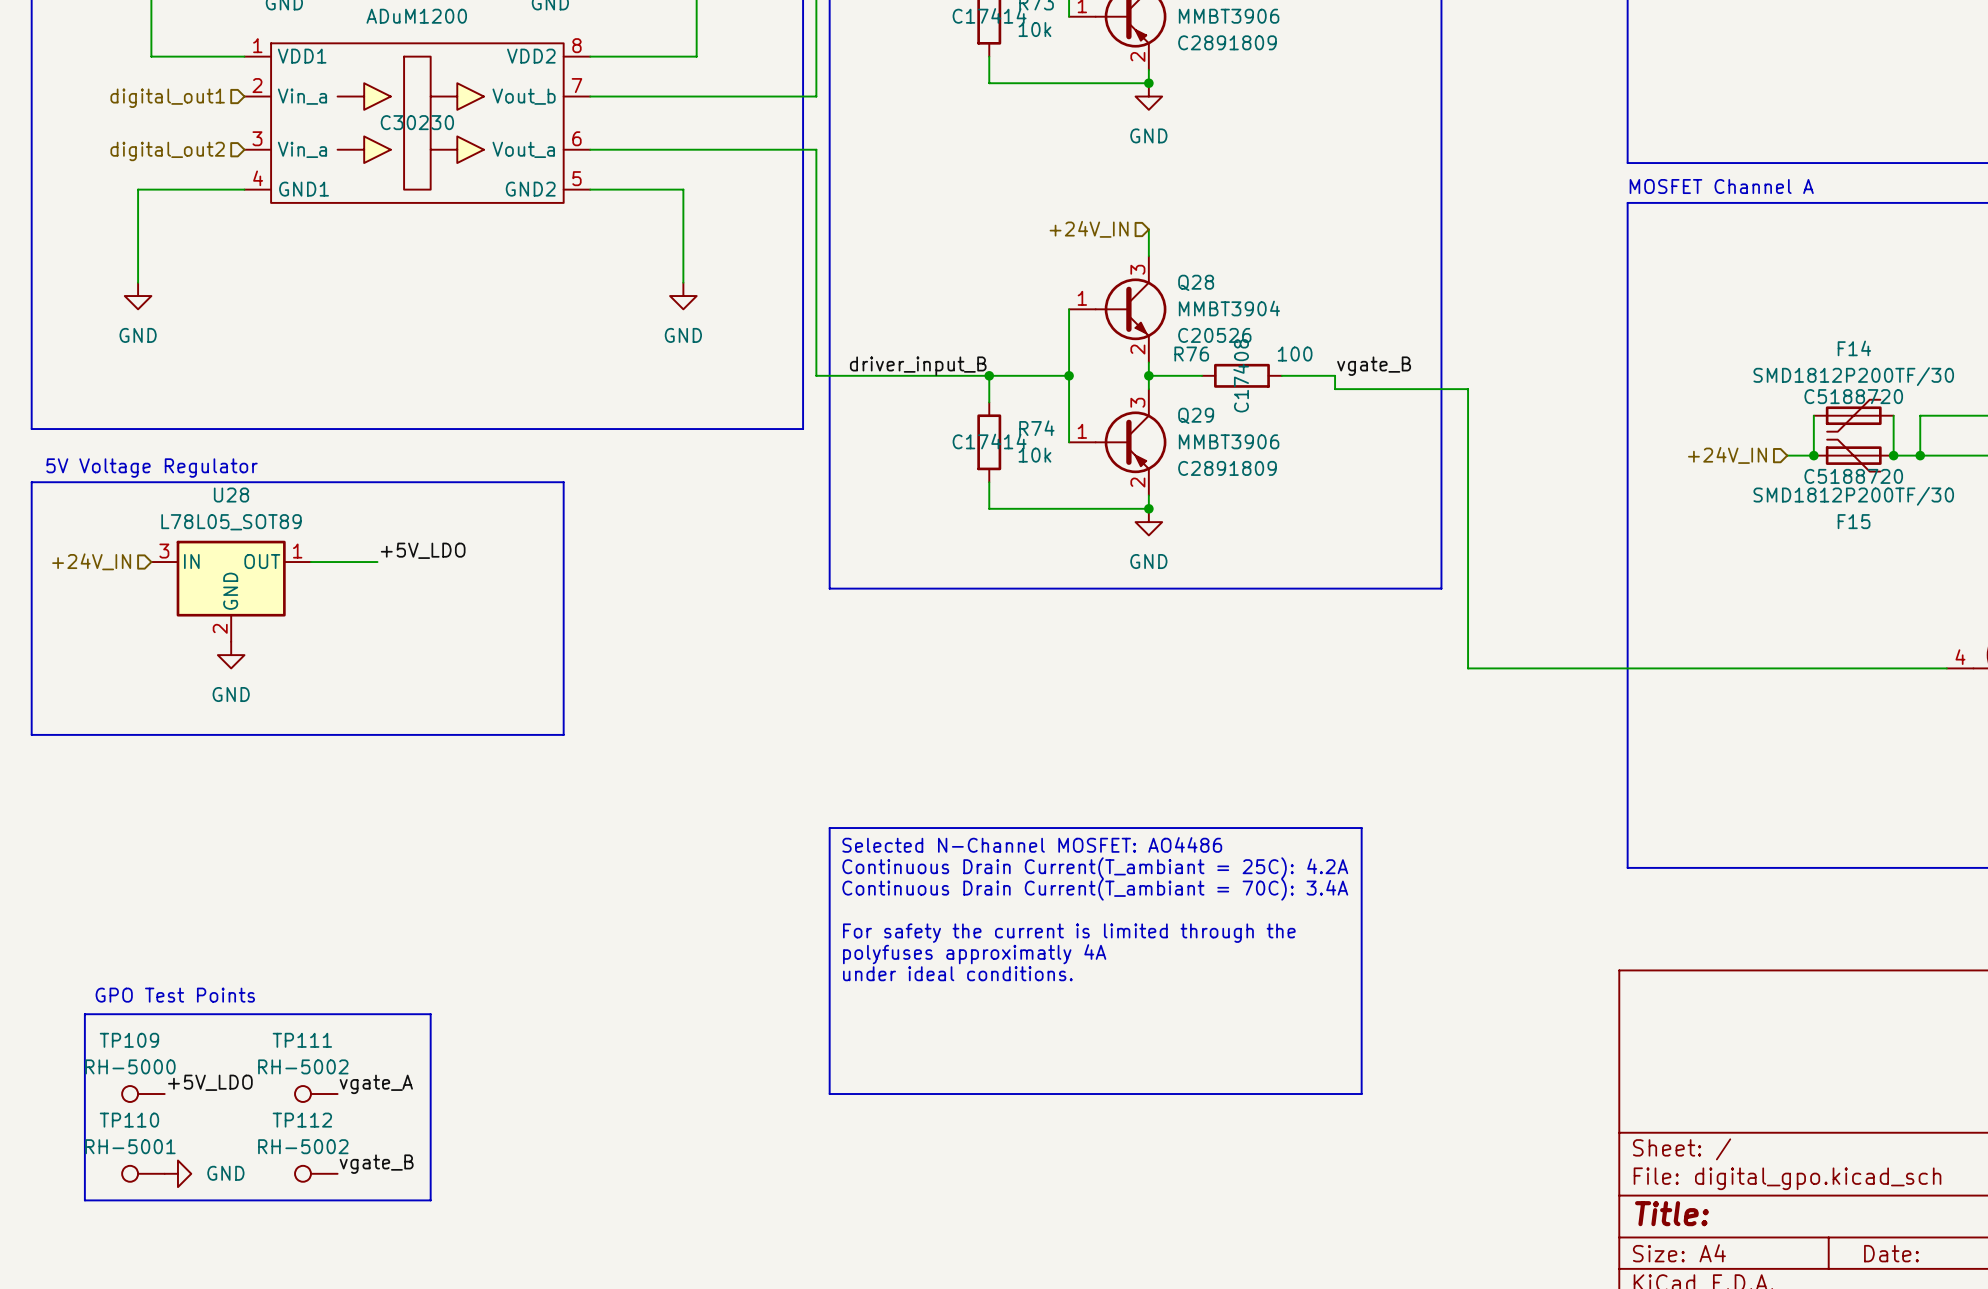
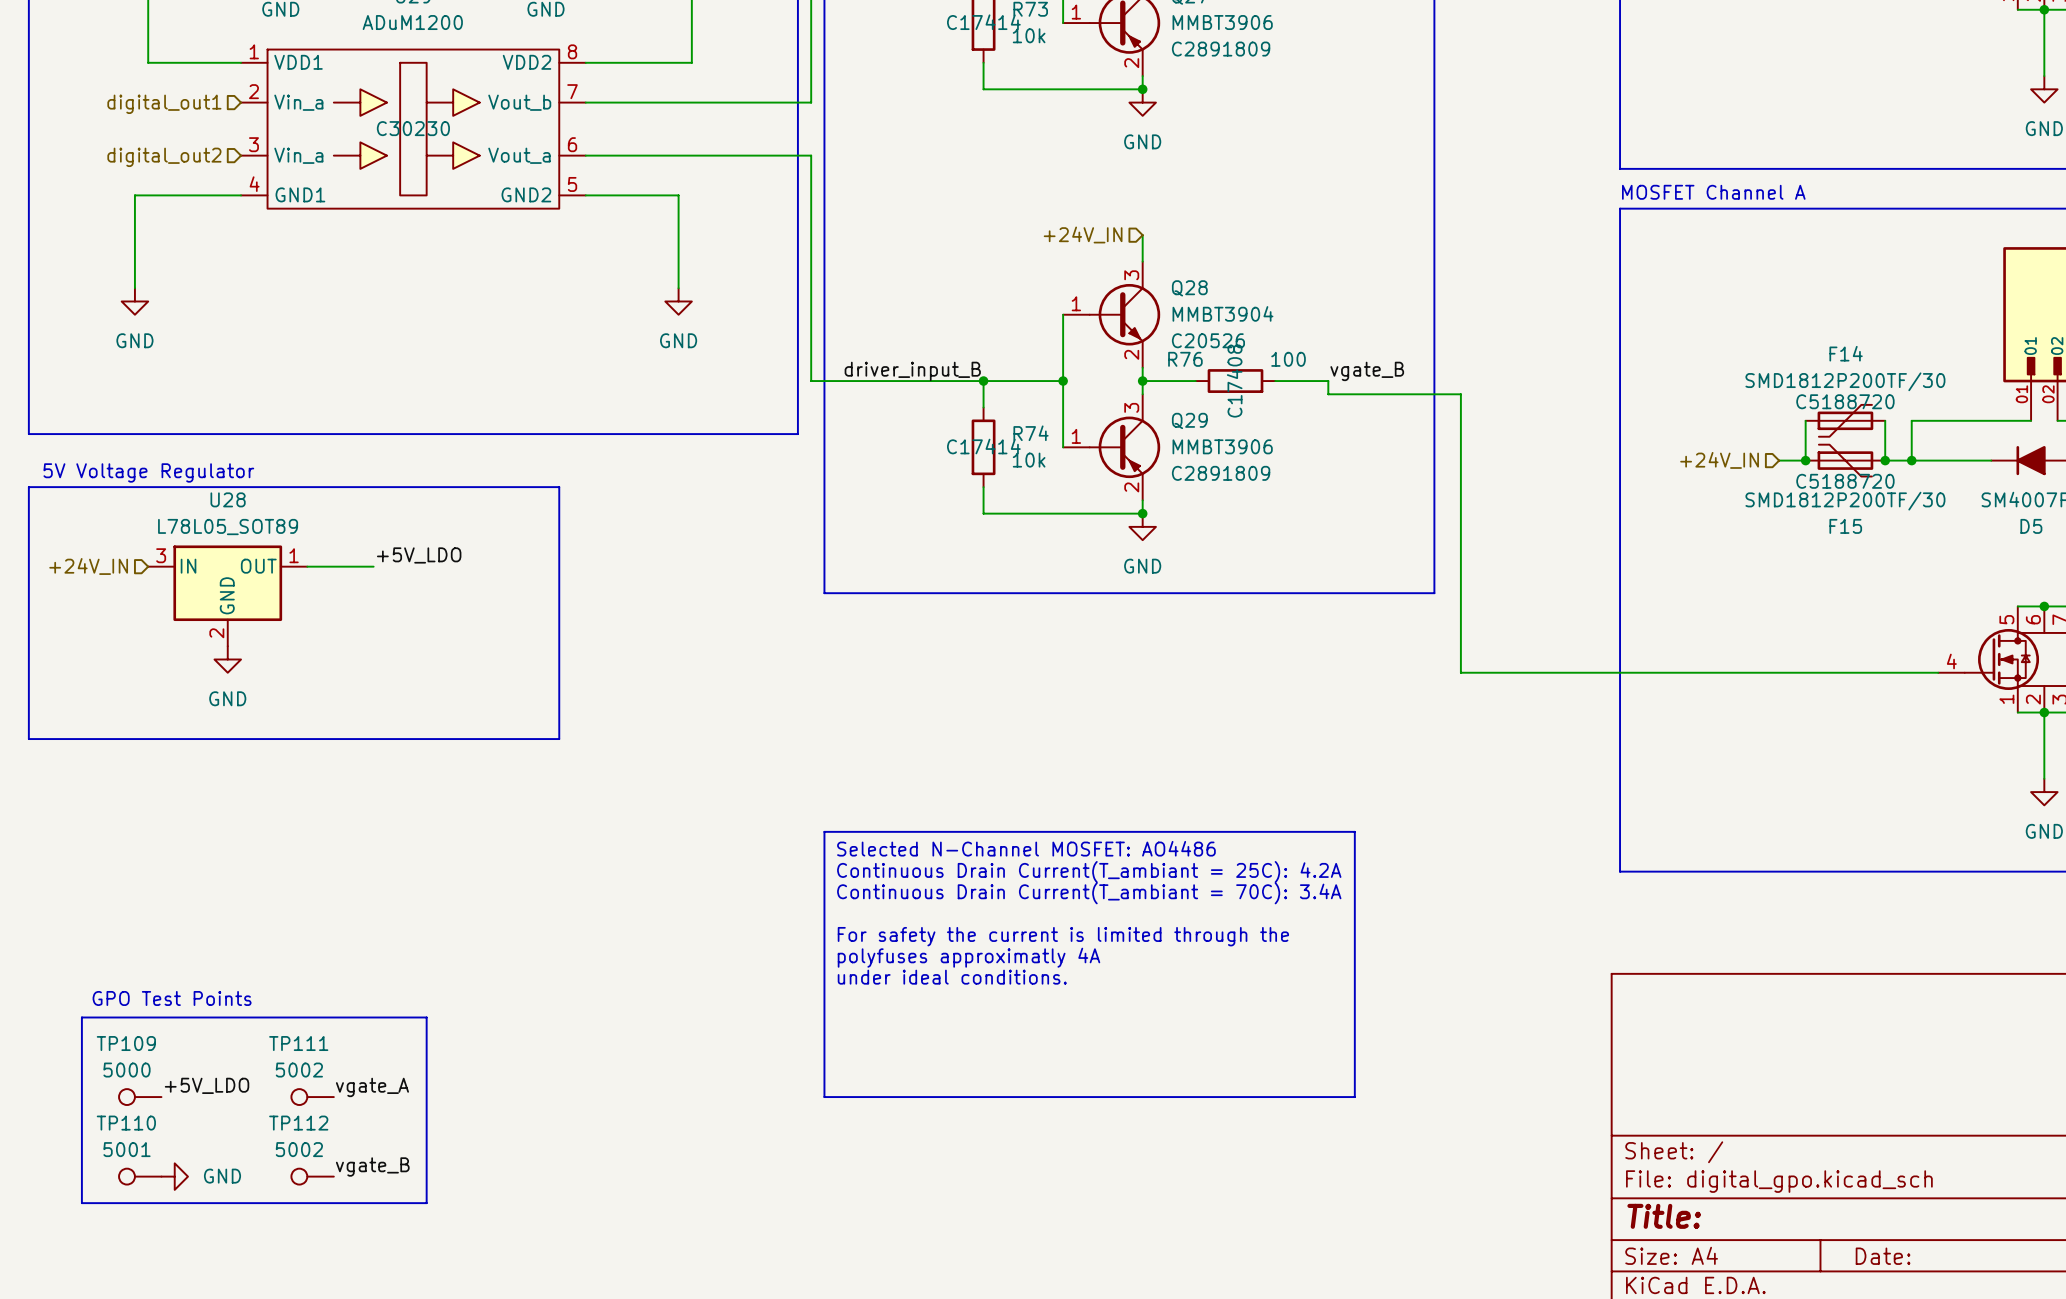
TP109 value: RH-5000 (130, 1066) -> 5000 (126, 1070)
TP111 value: RH-5002 (303, 1066) -> 5002 (299, 1070)
TP110 value: RH-5001 (130, 1146) -> 5001 (126, 1149)
TP112 value: RH-5002 (303, 1146) -> 5002 (299, 1149)

